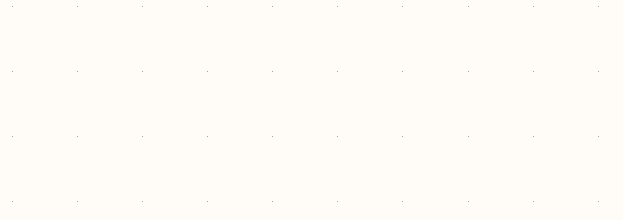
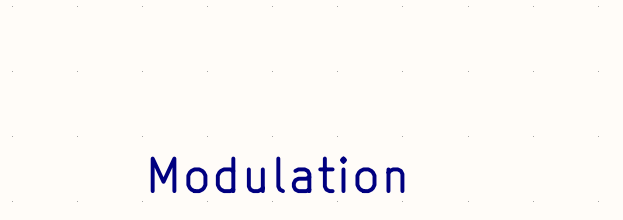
text: none -> Modulation (277, 174)

